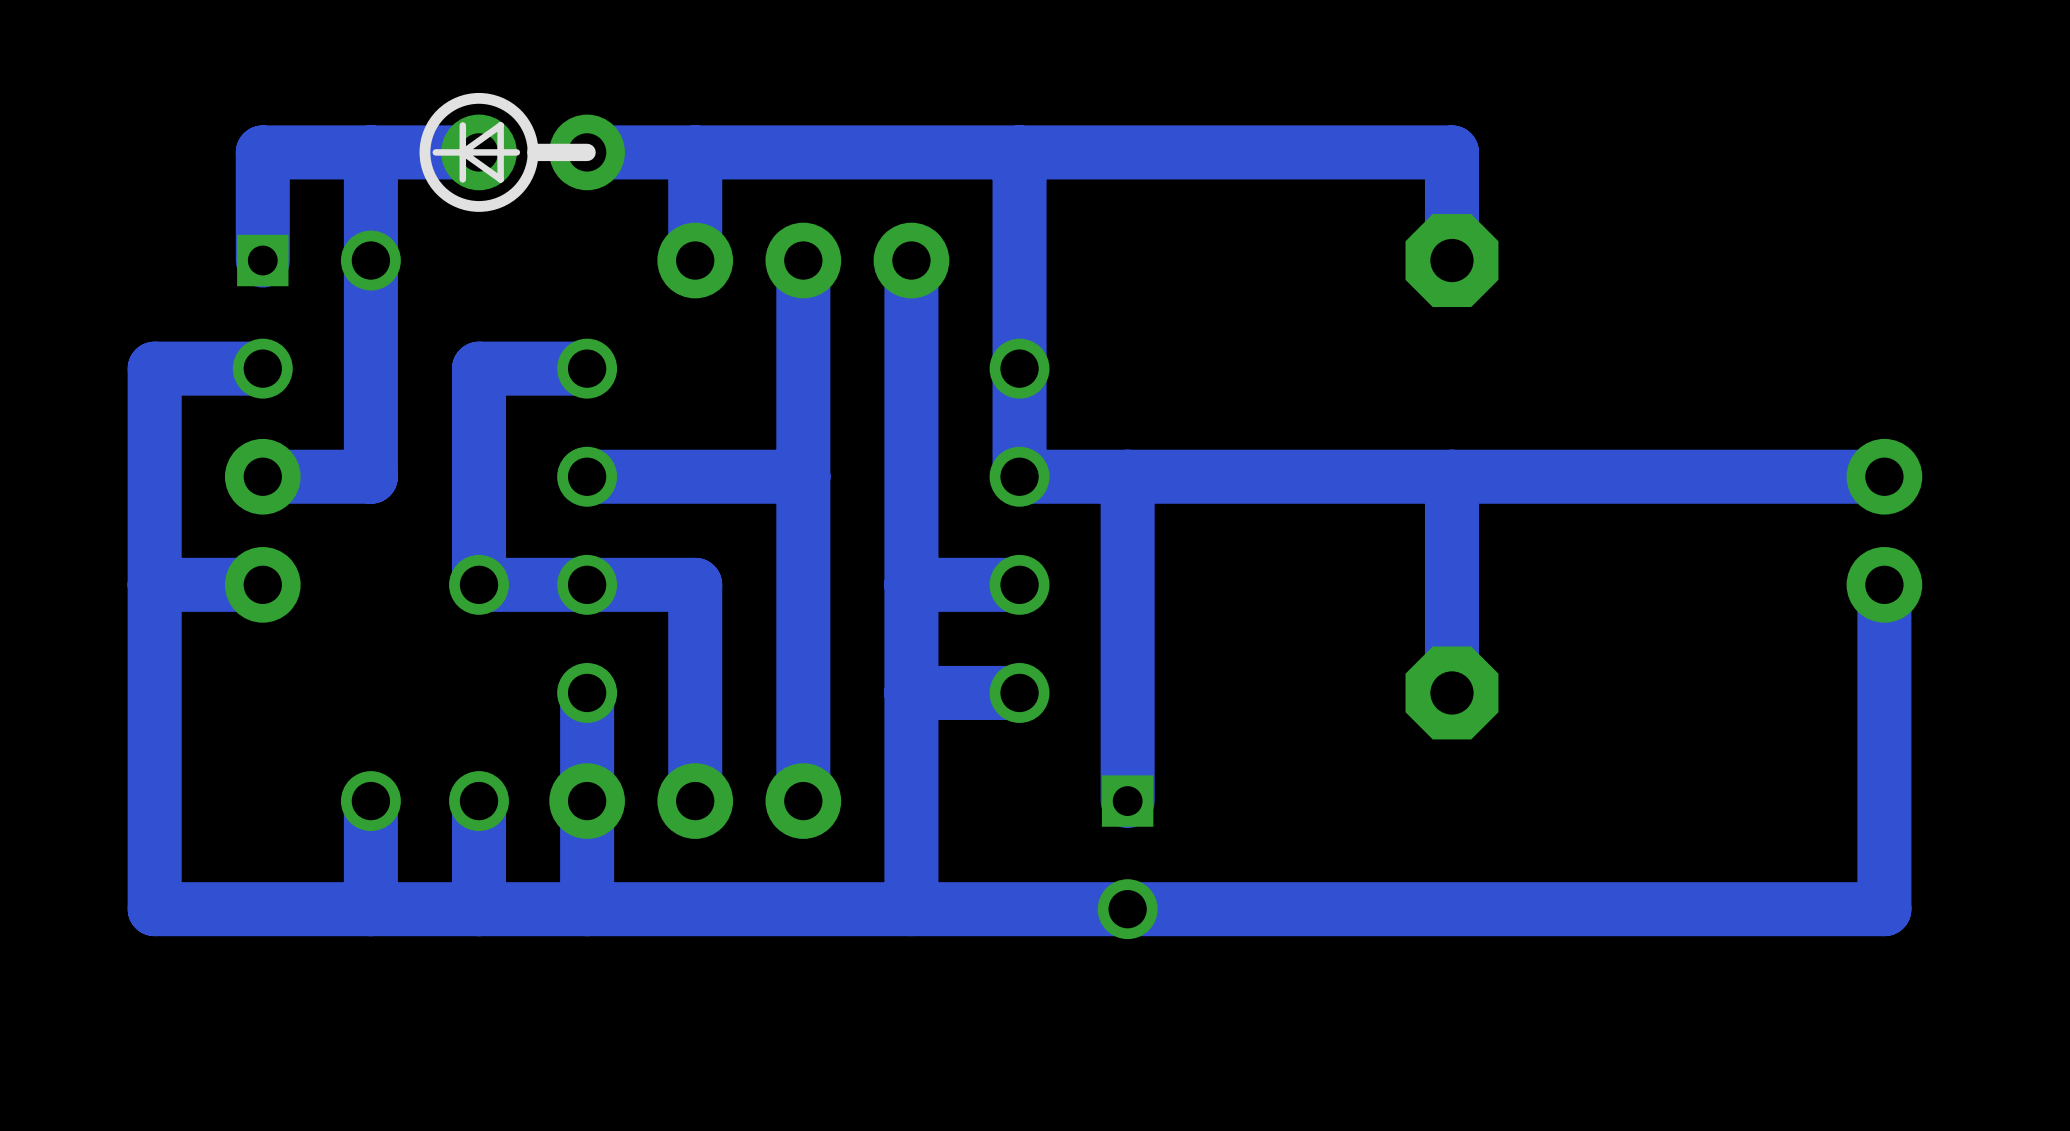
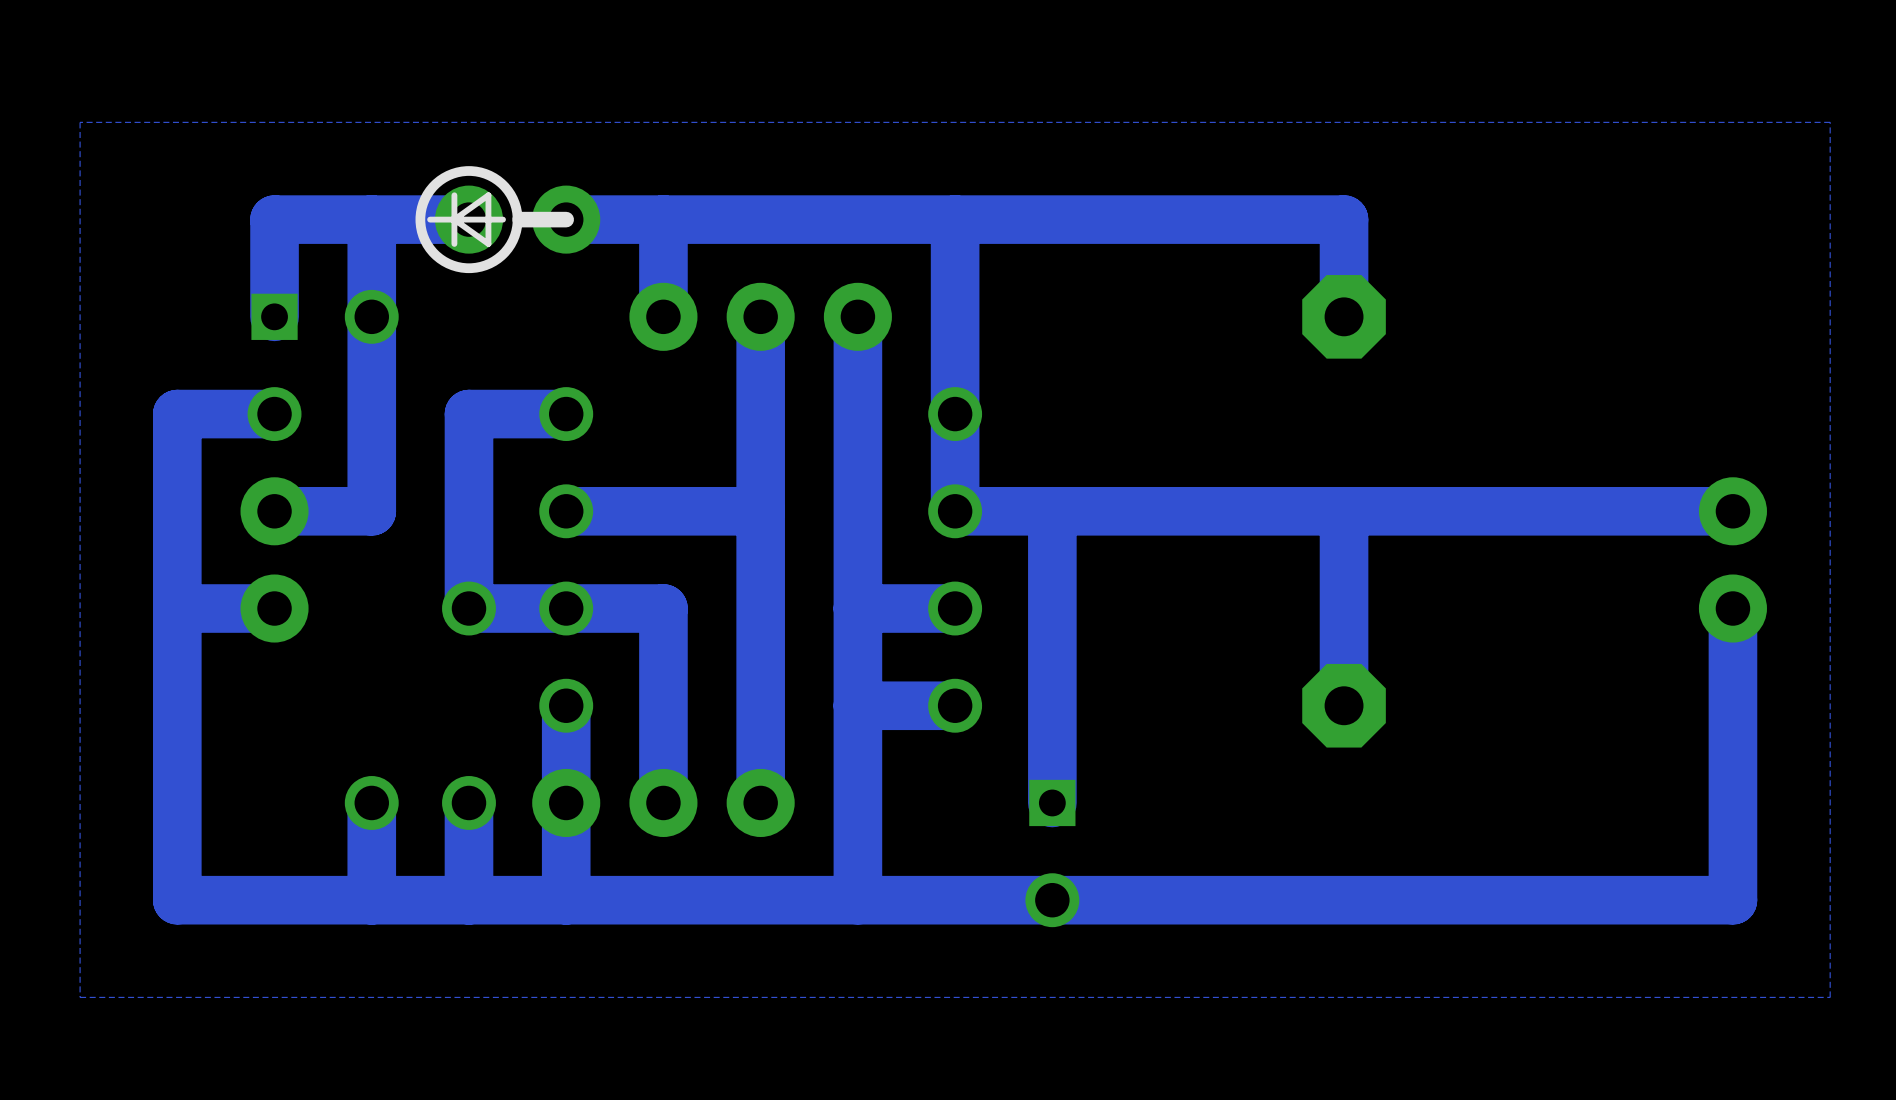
bottom zone outline: none -> (1830, 122) (80, 122) (80, 997) (1830, 997) (1830, 122)

